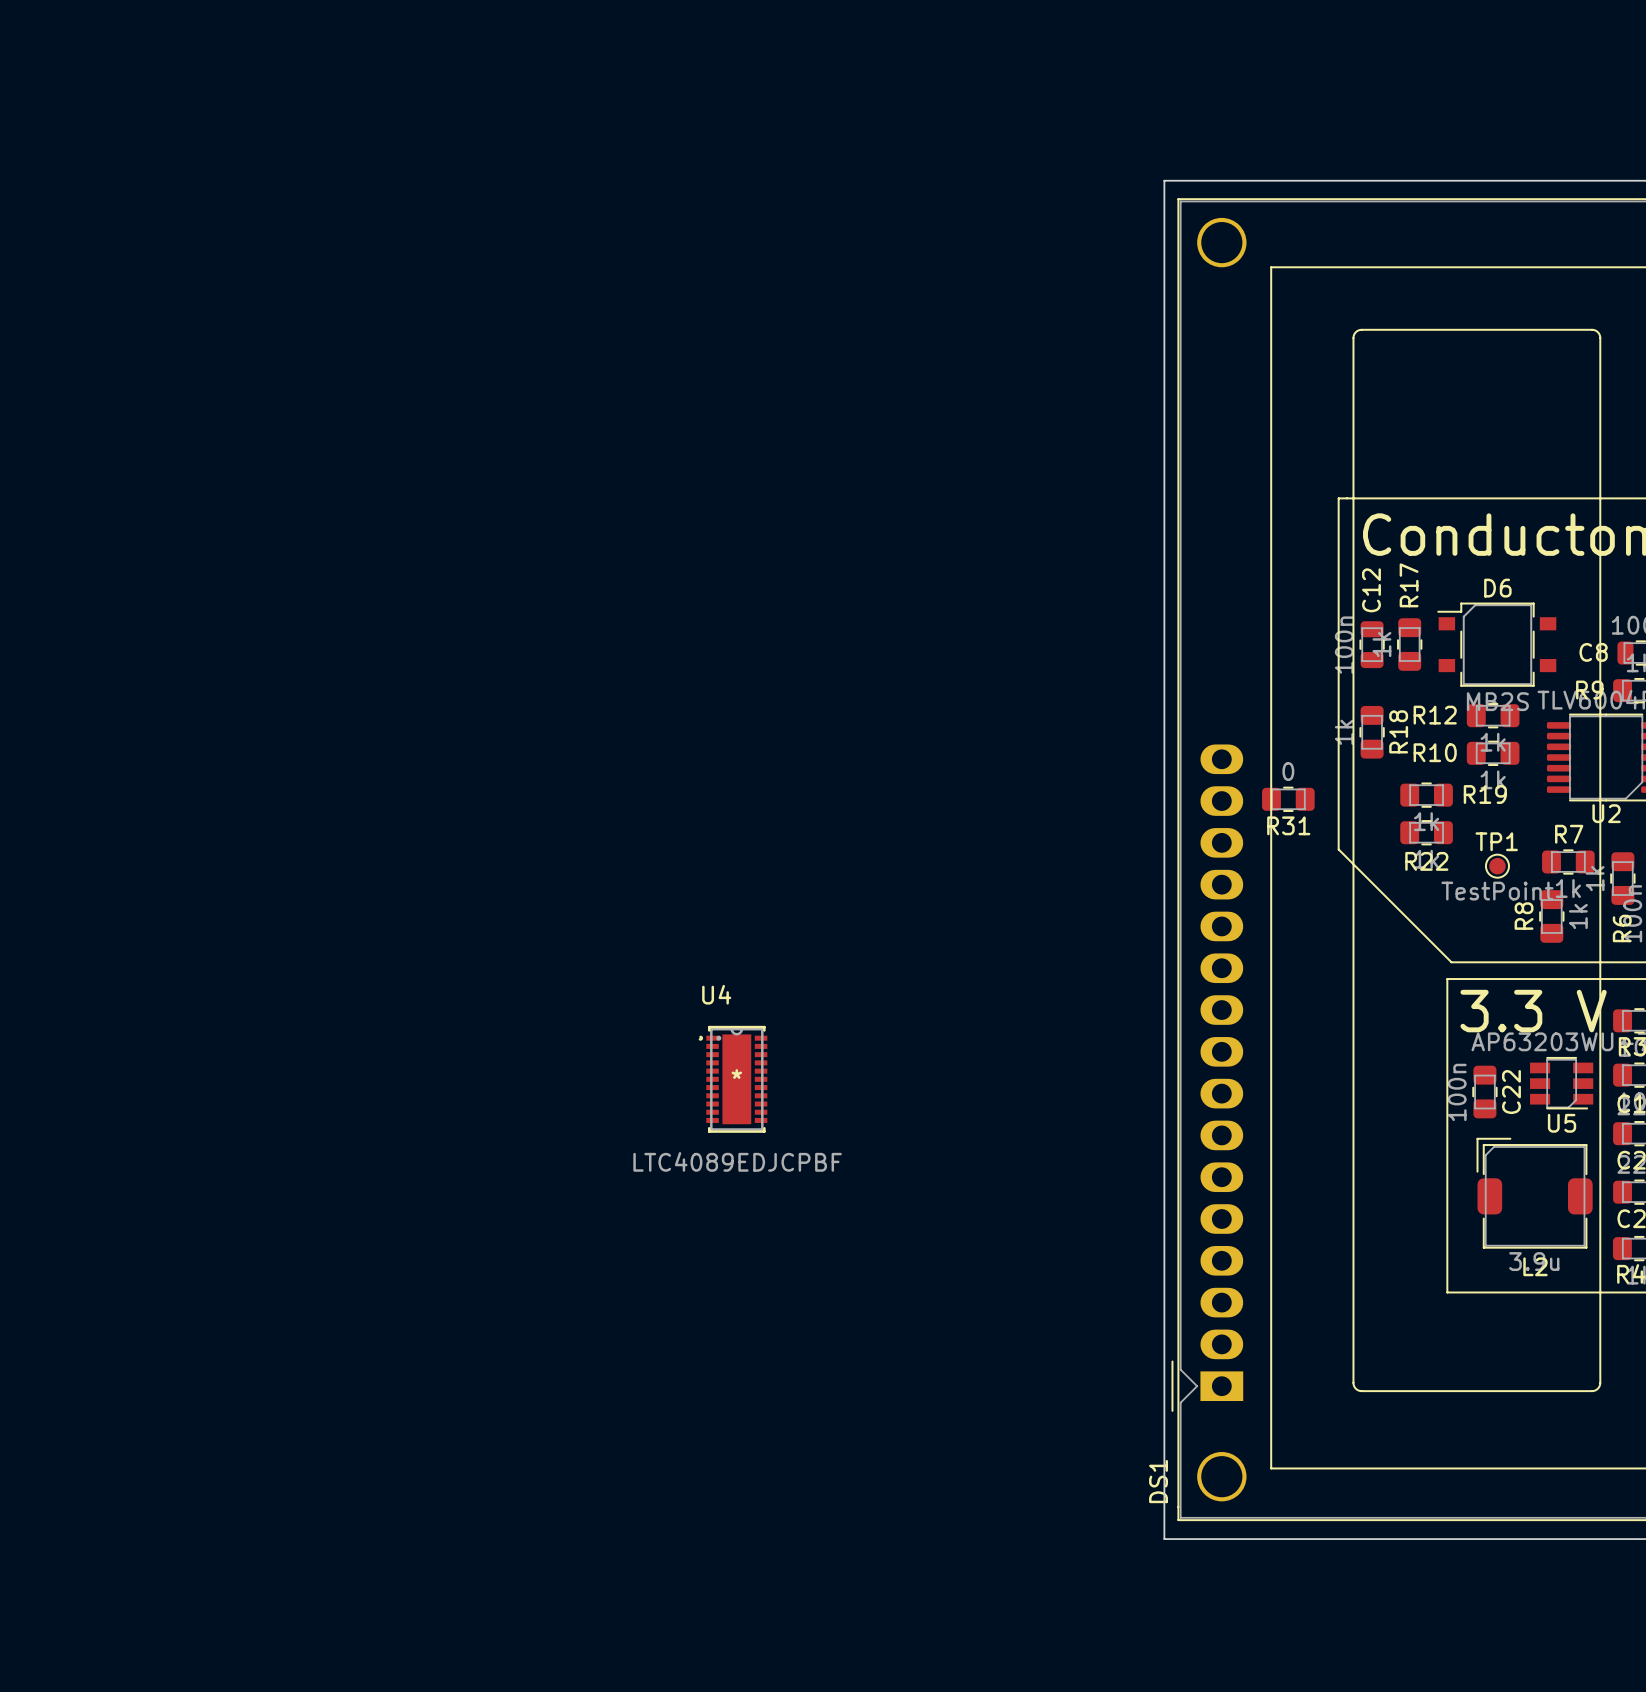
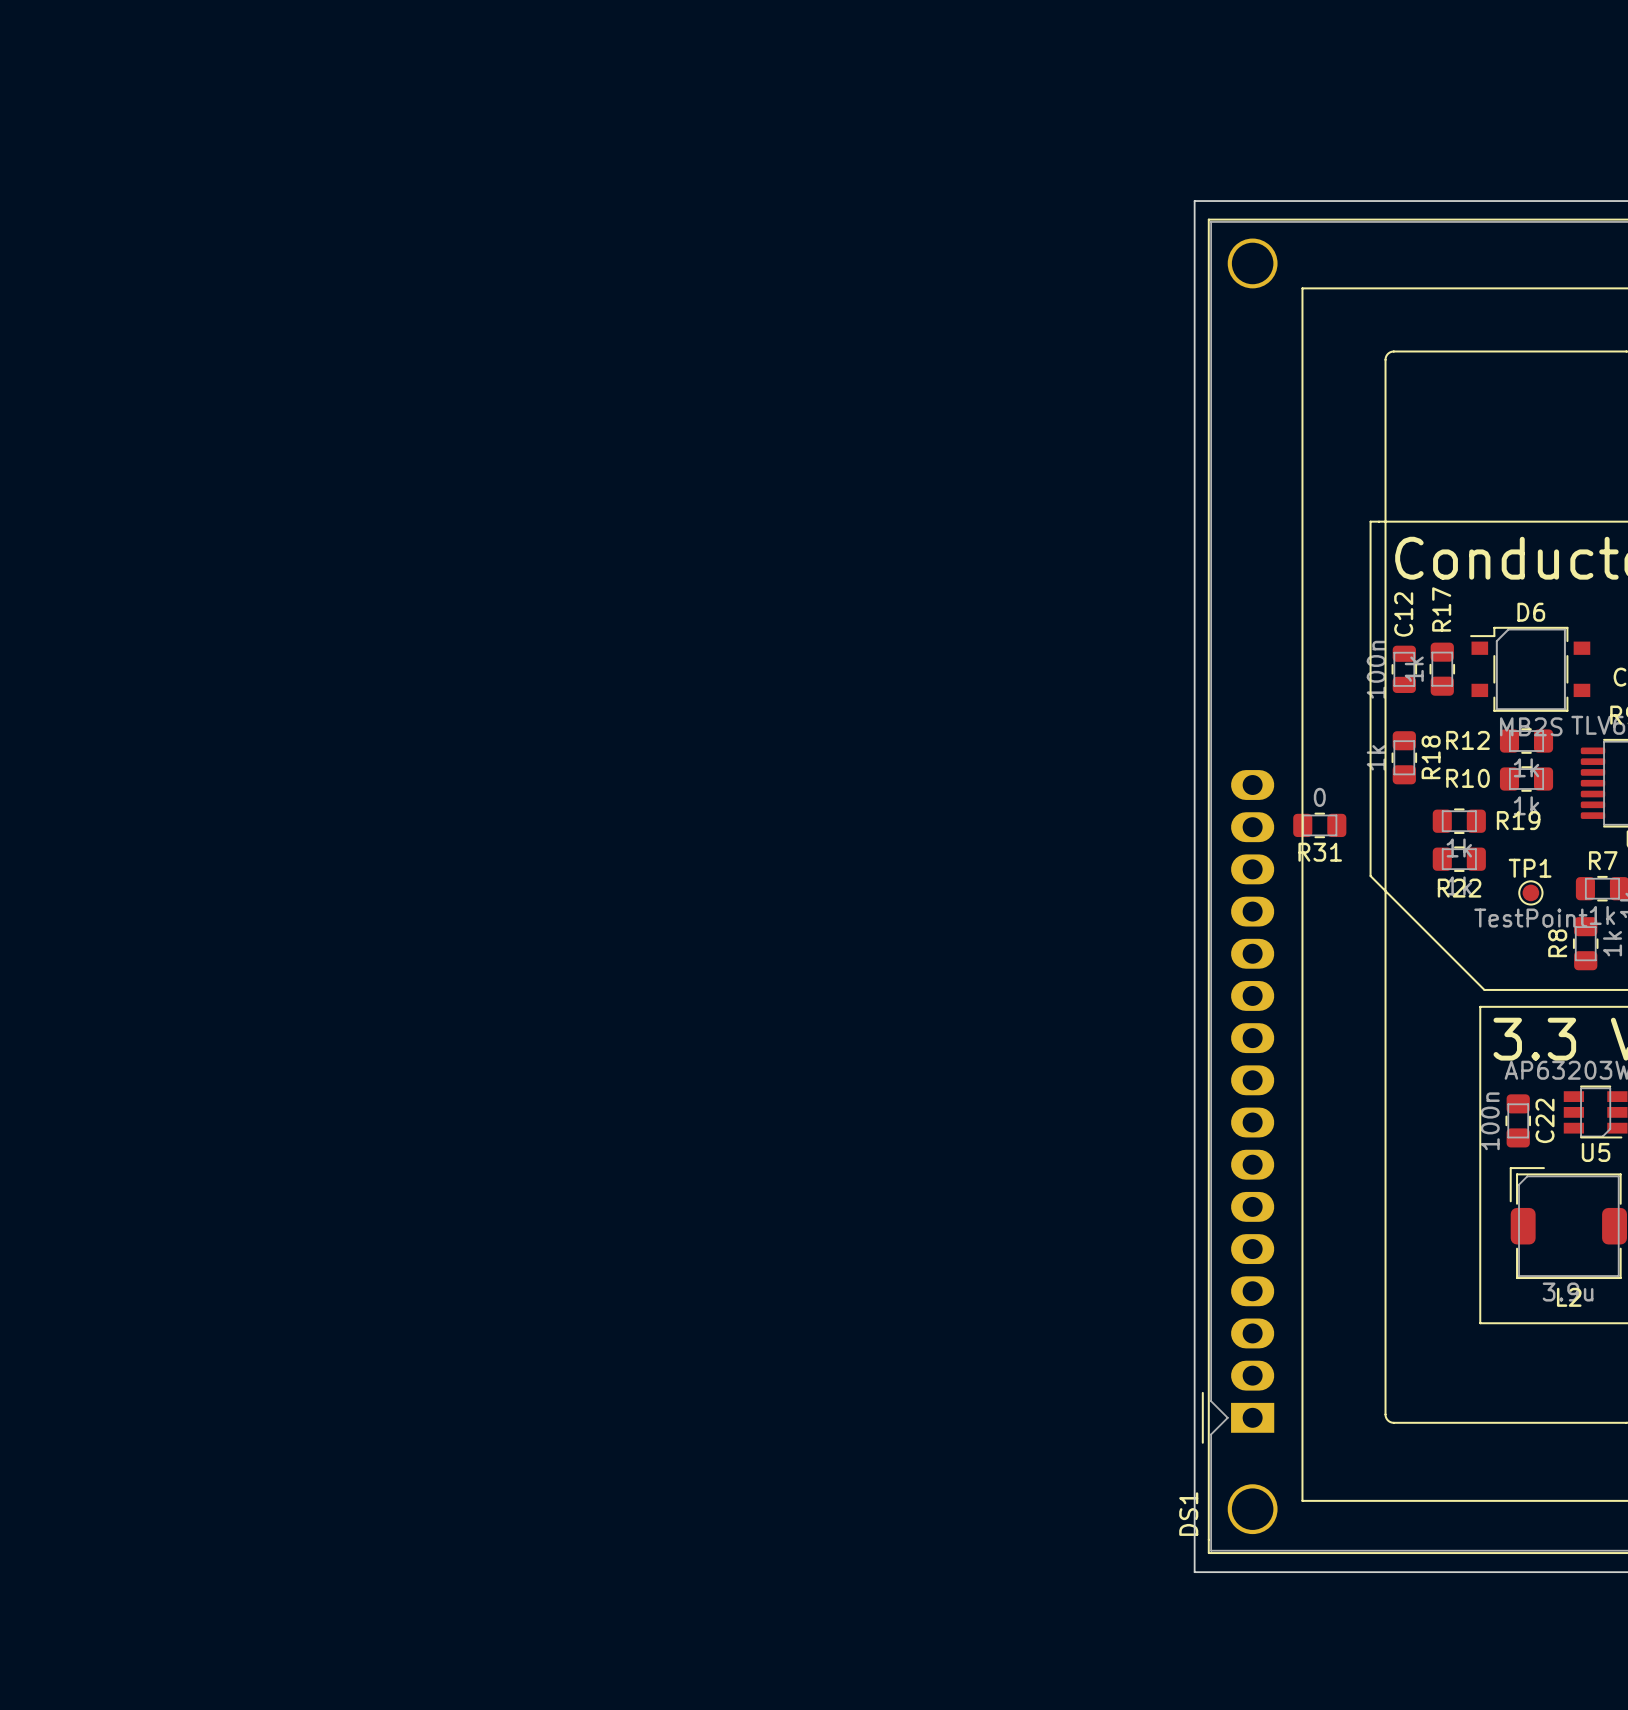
U4: LTC4089EDJCPBF (732, 1079) -> none

